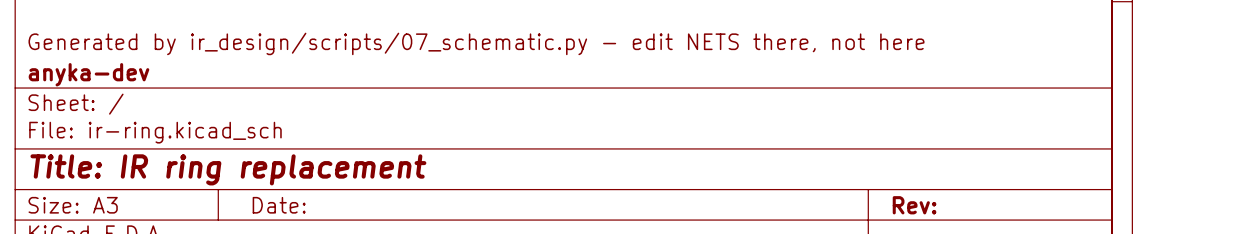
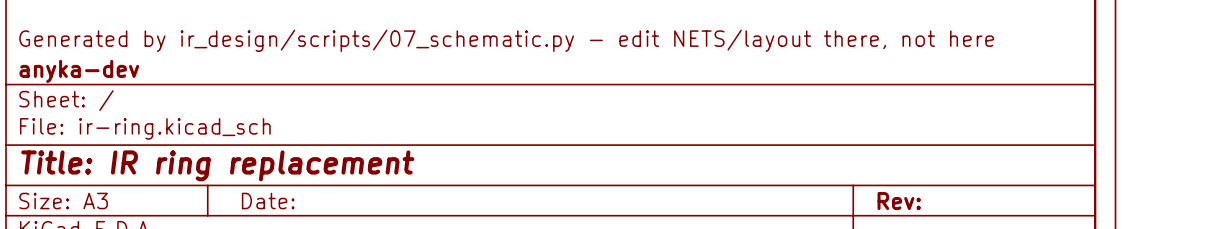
title block: Generated by ir_design/scripts/07_schematic.py - edit NETS there, not here (476, 43) -> Generated by ir_design/scripts/07_schematic.py - edit NETS/layout there, not here (506, 40)

